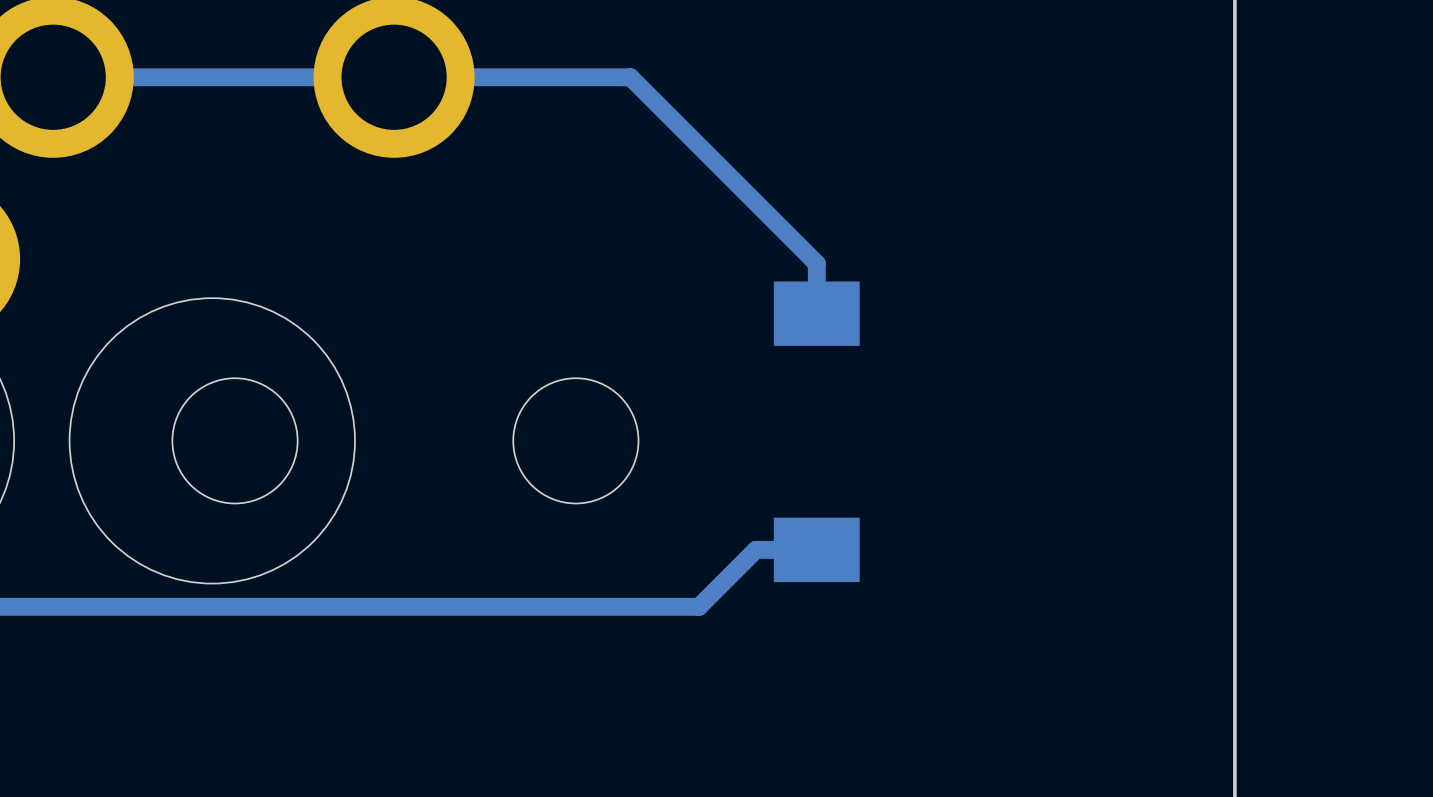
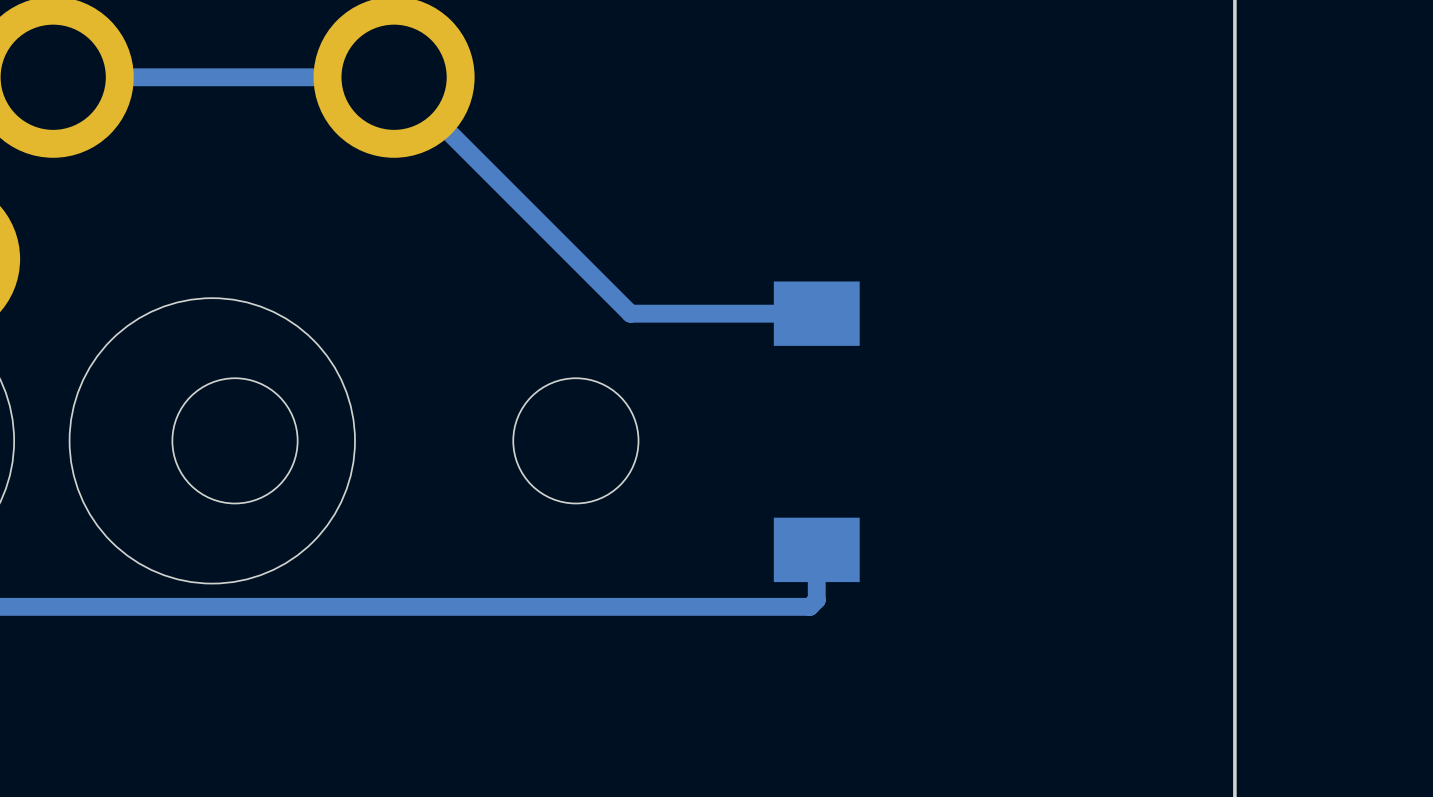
bottom track: (394, 77) (630, 77) (816, 263) (816, 313) -> (394, 77) (630, 313) (816, 313)
bottom track: (816, 549) (755, 549) (698, 606) -> (816, 549) (816, 599) (809, 606) (698, 606)

